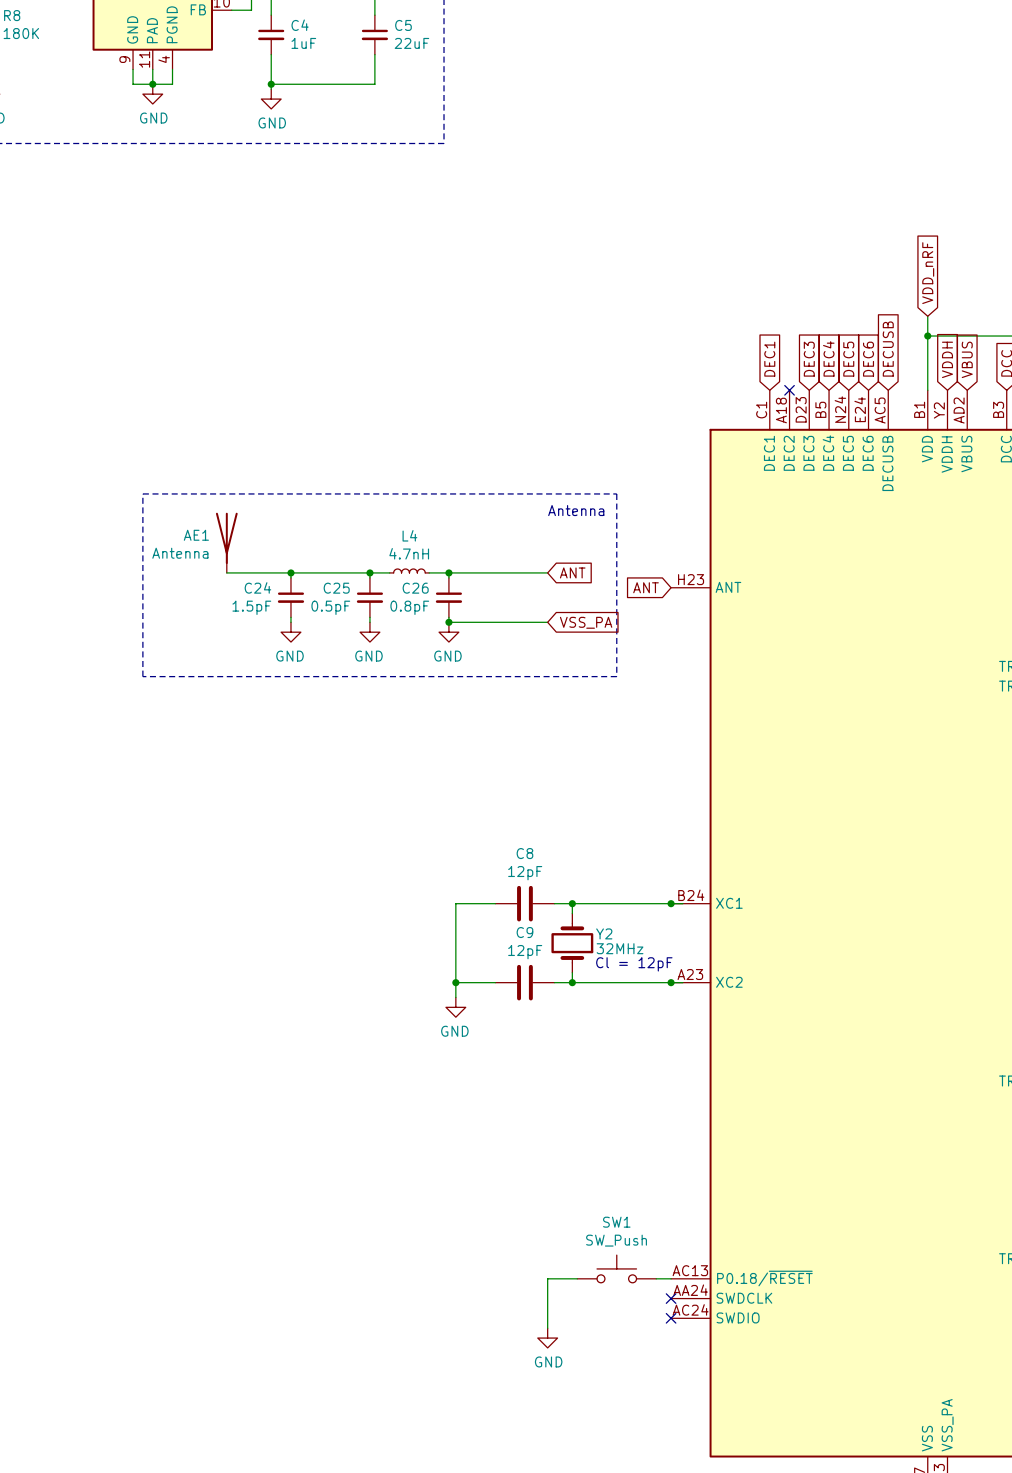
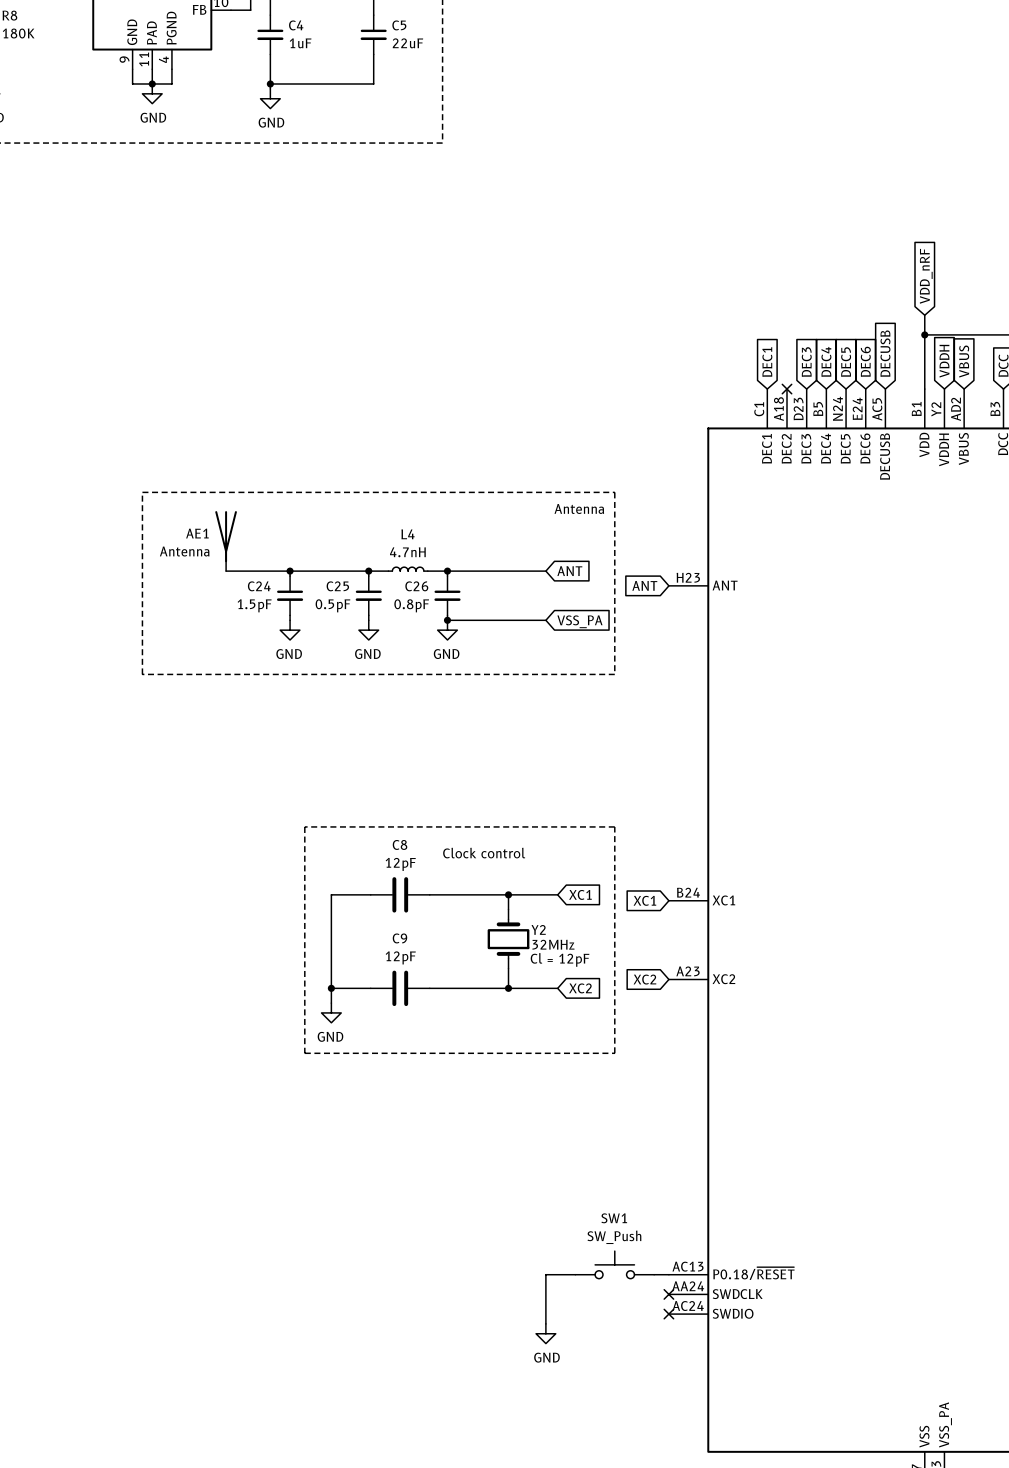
line: none -> (304, 826) (614, 826) (614, 1053) (304, 1053) (304, 826)
text: none -> Clock control (484, 853)
wire: none -> (370, 894) (331, 894) (331, 1003)
wire: none -> (508, 894) (508, 909)
junction: none -> (508, 894)
global label: none -> XC1 (580, 894)
wire: (495, 903) (455, 903) (455, 997) -> none
C8 position: (524, 903) -> (400, 894)
wire: (554, 903) (682, 903) -> (429, 894) (557, 894)
wire: (572, 903) (572, 913) -> none
junction: (572, 903) -> none
global label: none -> XC1 (644, 900)
junction: (671, 903) -> none
Y2 position: (572, 943) -> (508, 939)
text position: Cl = 12pF (634, 964) -> Cl = 12pF (560, 959)
wire: none -> (508, 968) (508, 988)
wire: (572, 972) (572, 982) -> none
wire: (455, 982) (495, 982) -> (331, 988) (370, 988)
junction: (455, 982) -> none
C9 position: (524, 982) -> (400, 988)
wire: (554, 982) (682, 982) -> (429, 988) (557, 988)
junction: (572, 982) -> none
global label: none -> XC2 (644, 979)
junction: (671, 982) -> none
junction: none -> (331, 988)
junction: none -> (508, 988)
global label: none -> XC2 (580, 988)
power symbol position: GND (455, 1007) -> GND (331, 1012)

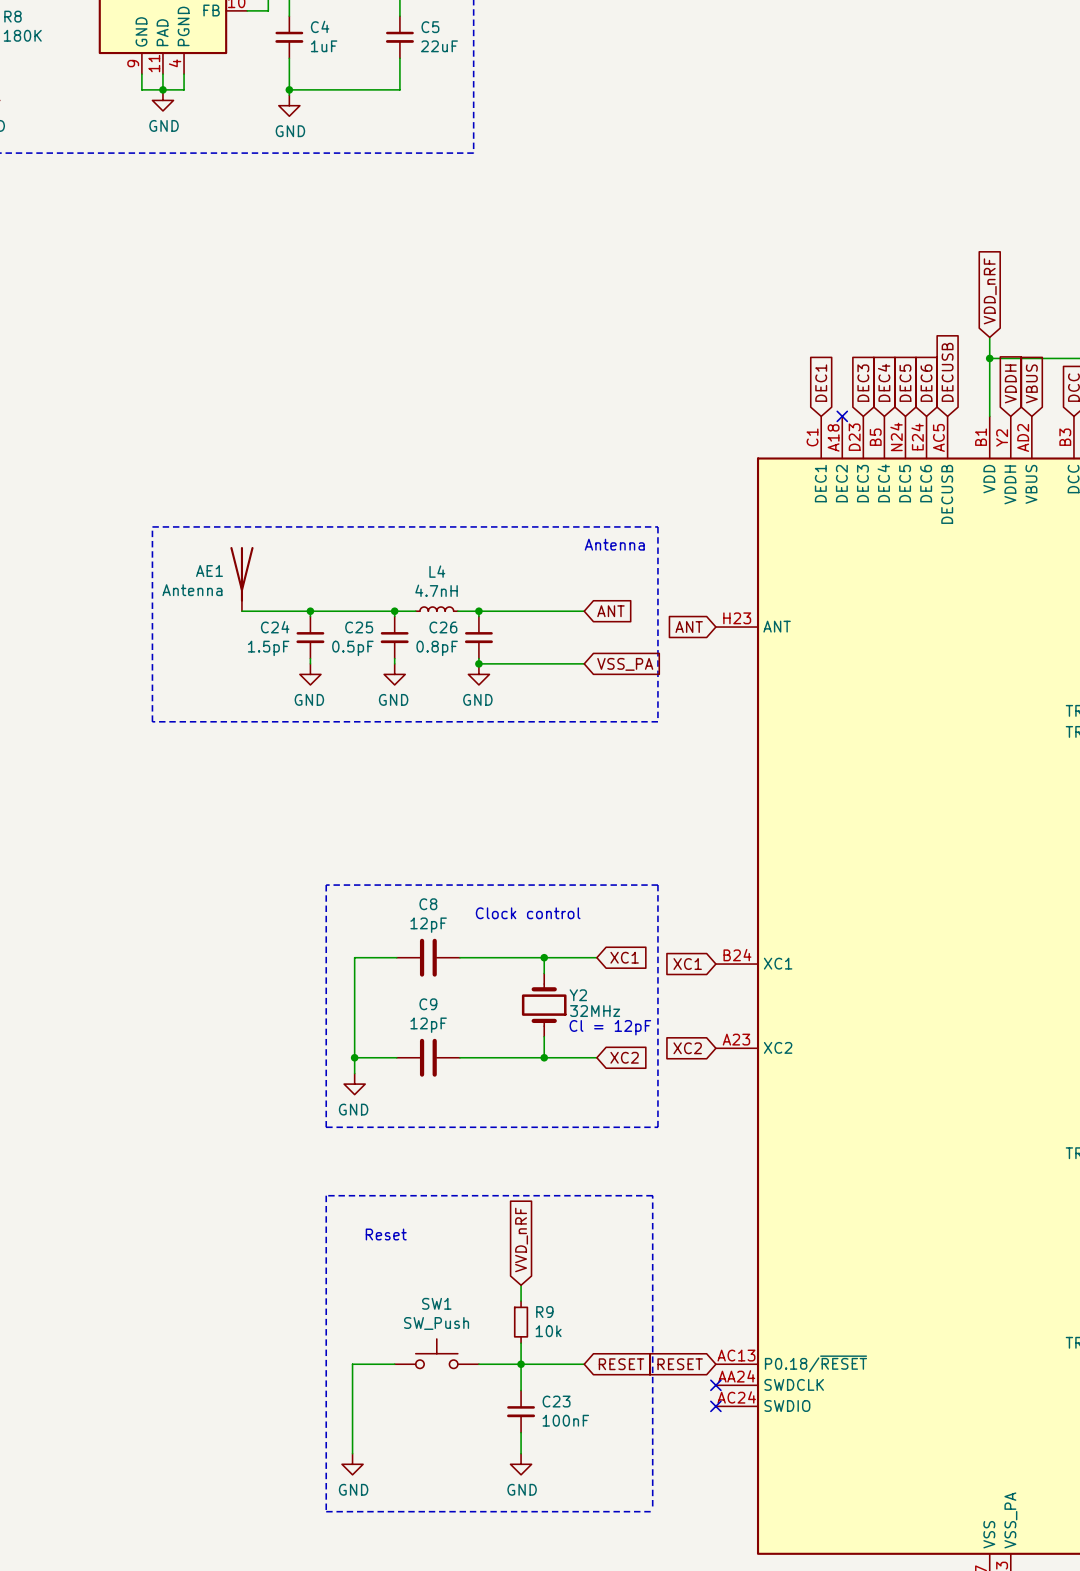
text: none -> Reset (386, 1234)
global label: none -> VVD_nRF (521, 1239)
wire: none -> (521, 1285) (521, 1301)
R9: none -> 10k (521, 1322)
wire: none -> (521, 1343) (521, 1390)
SW1 position: (614, 1264) -> (436, 1353)
wire: none -> (394, 1364) (352, 1364) (352, 1453)
wire: none -> (478, 1364) (584, 1364)
junction: none -> (521, 1364)
wire: (575, 1274) (545, 1274) (545, 1323) -> none
global label: none -> RESET (621, 1364)
global label: none -> RESET (680, 1364)
wire: (654, 1274) (668, 1274) -> none
C23: none -> 100nF (521, 1411)
power symbol position: GND (545, 1333) -> GND (521, 1464)
wire: none -> (521, 1432) (521, 1453)
power symbol: none -> GND (352, 1464)
line: none -> (652, 1506) (652, 1195) (326, 1195) (326, 1511) (652, 1511)

